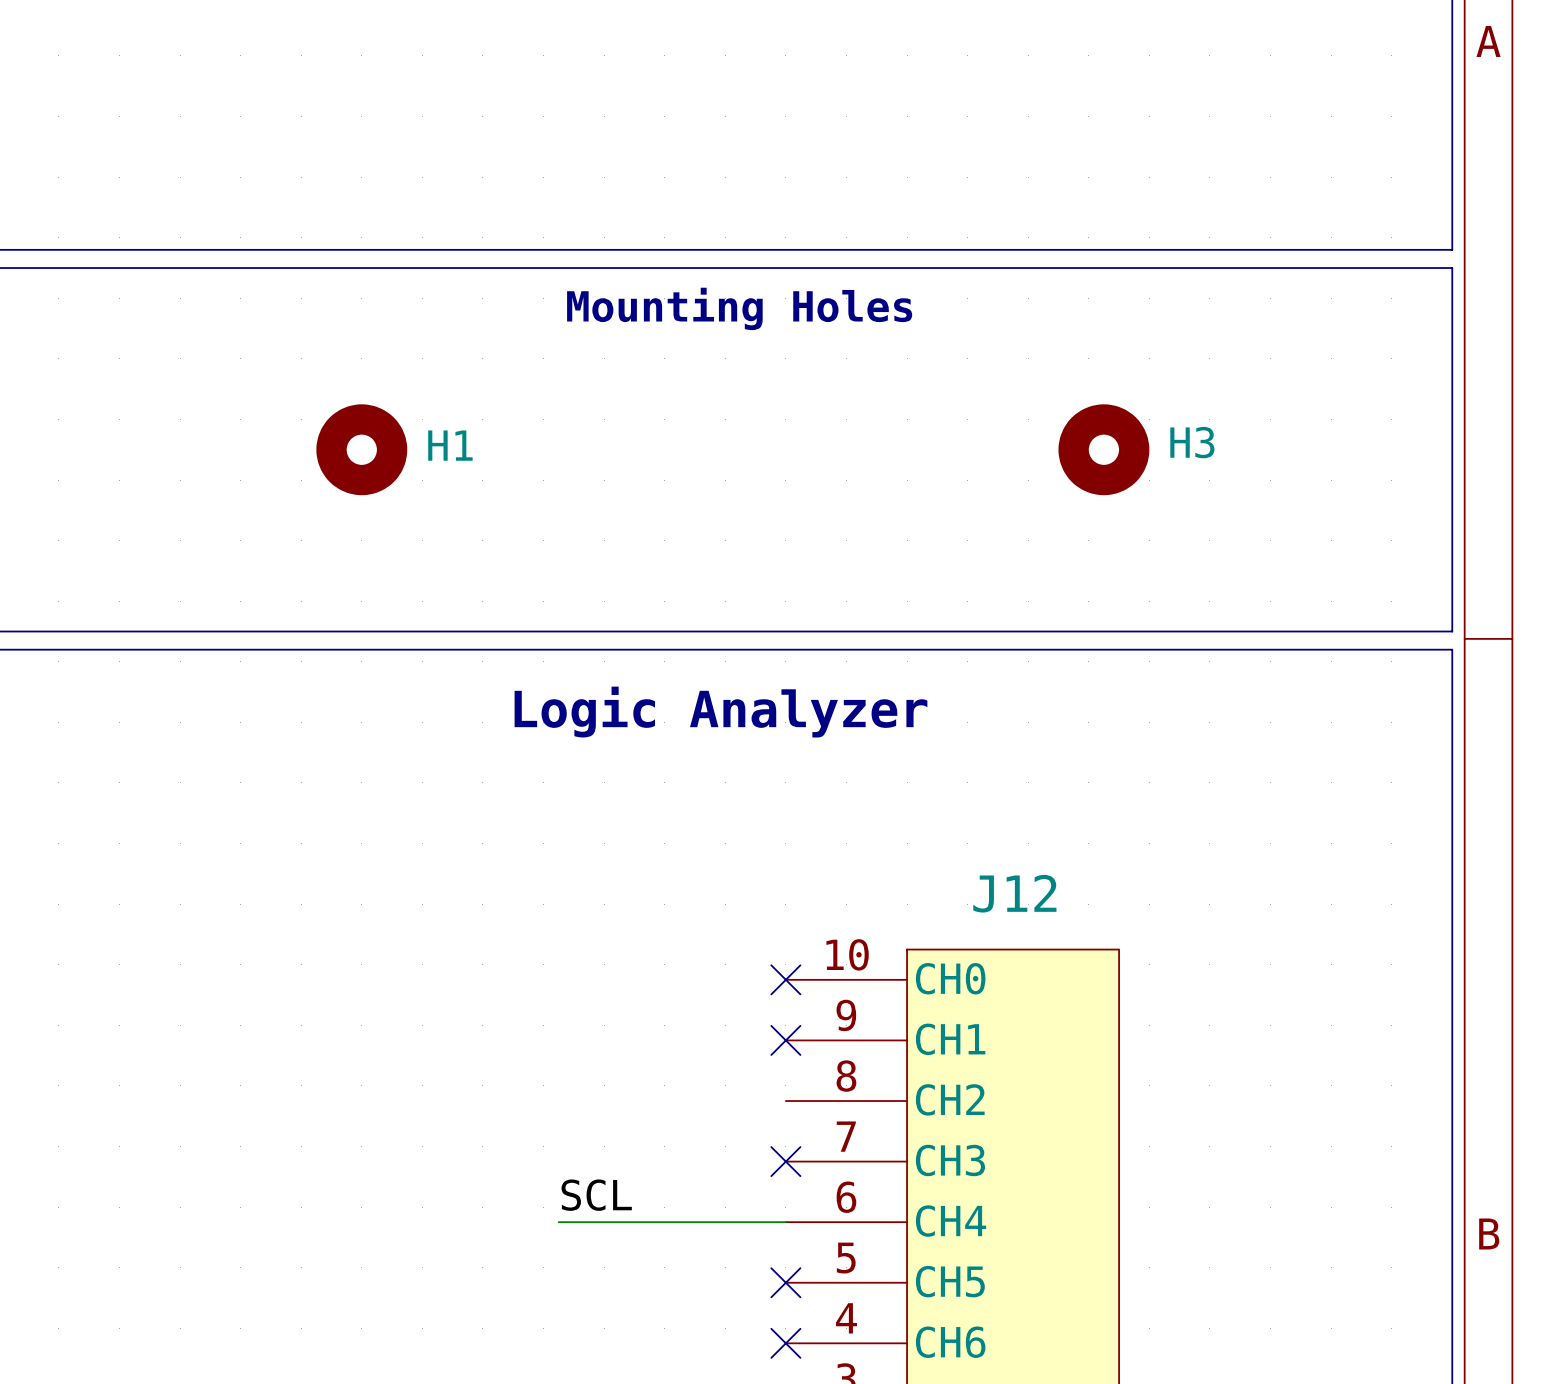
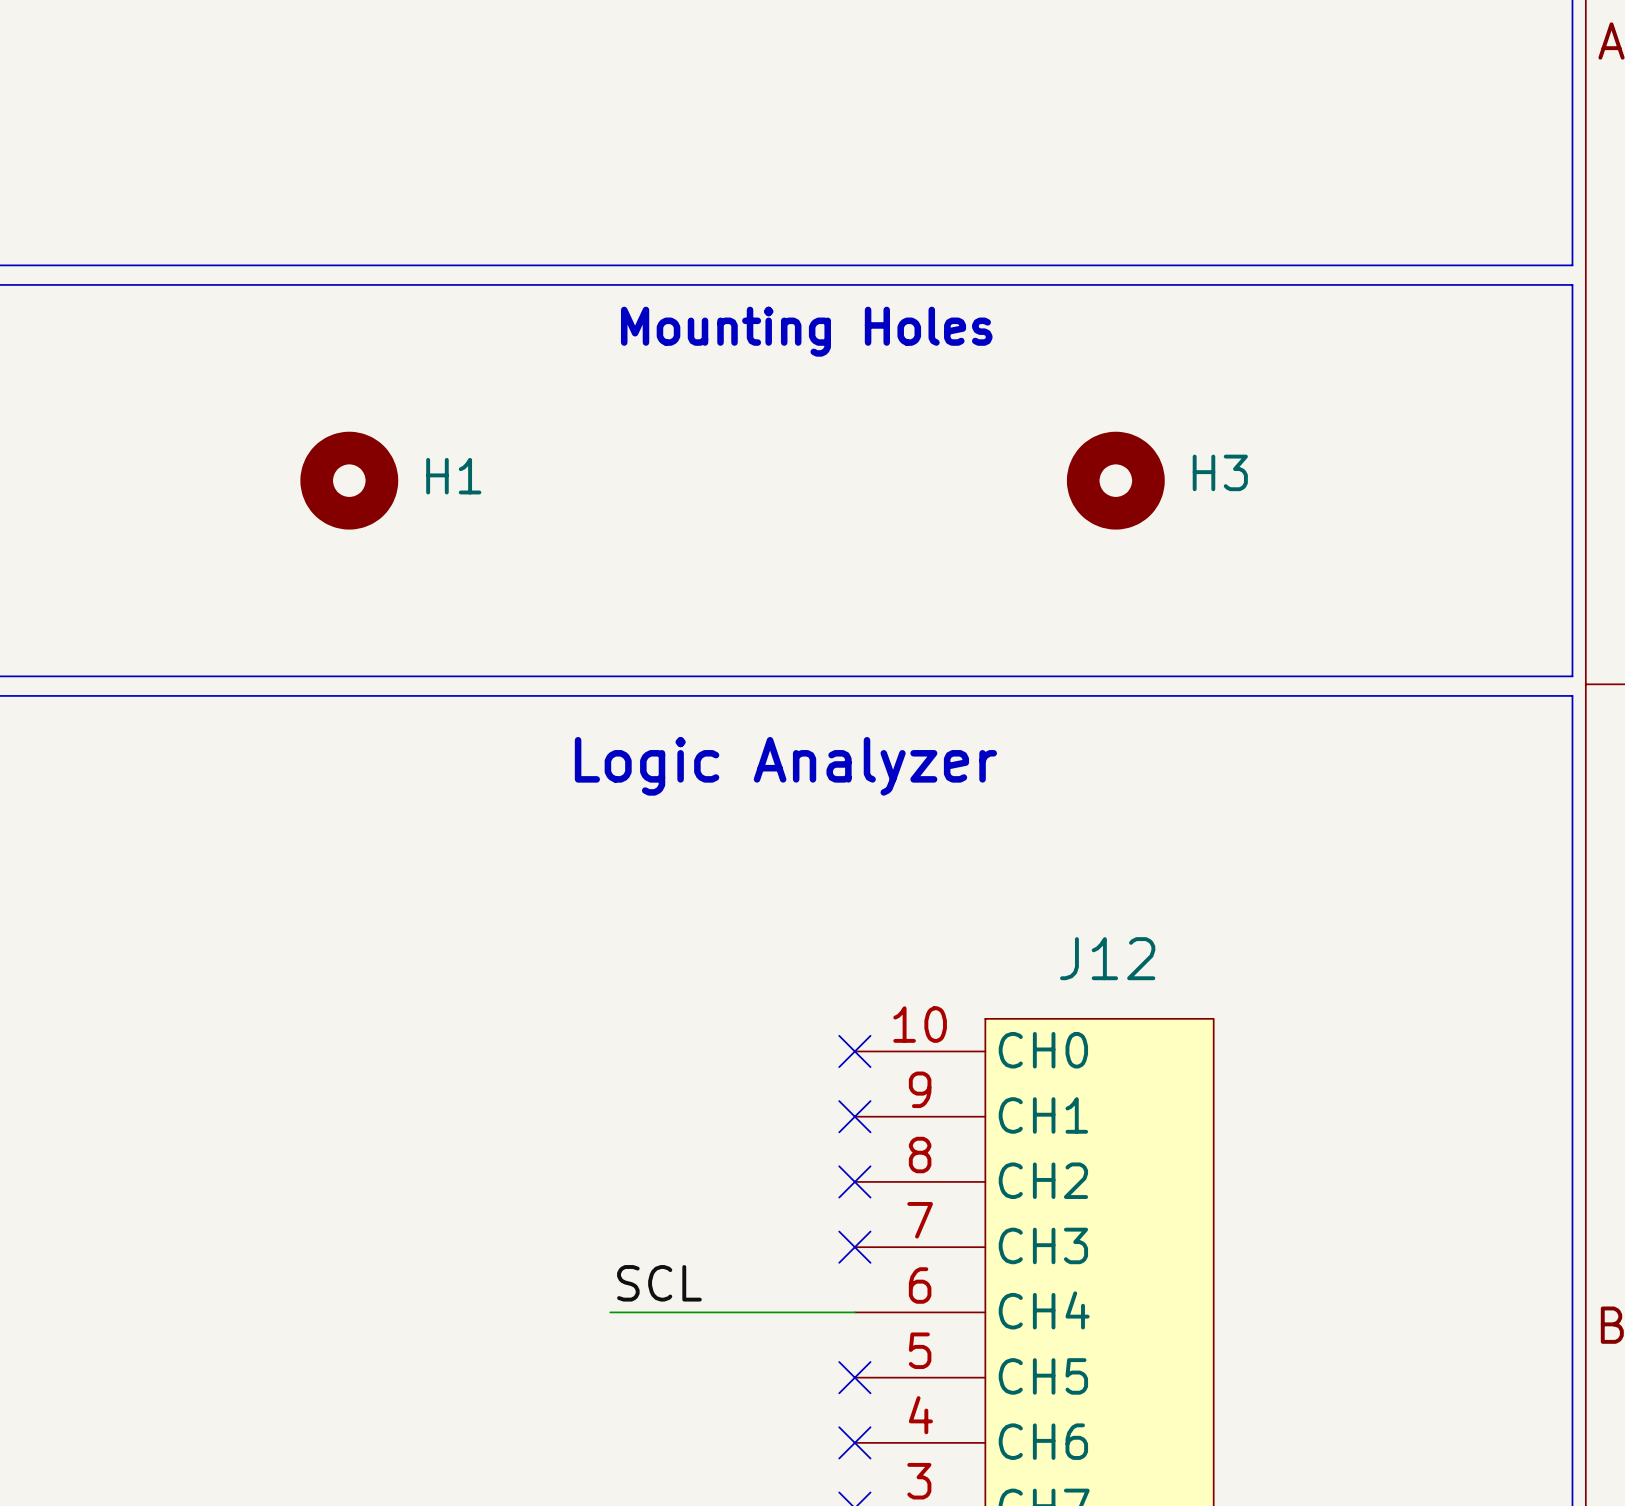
H1 position: (361, 449) -> (349, 480)
H3 position: (1103, 449) -> (1115, 480)
no-connect mark: none -> (854, 1181)

